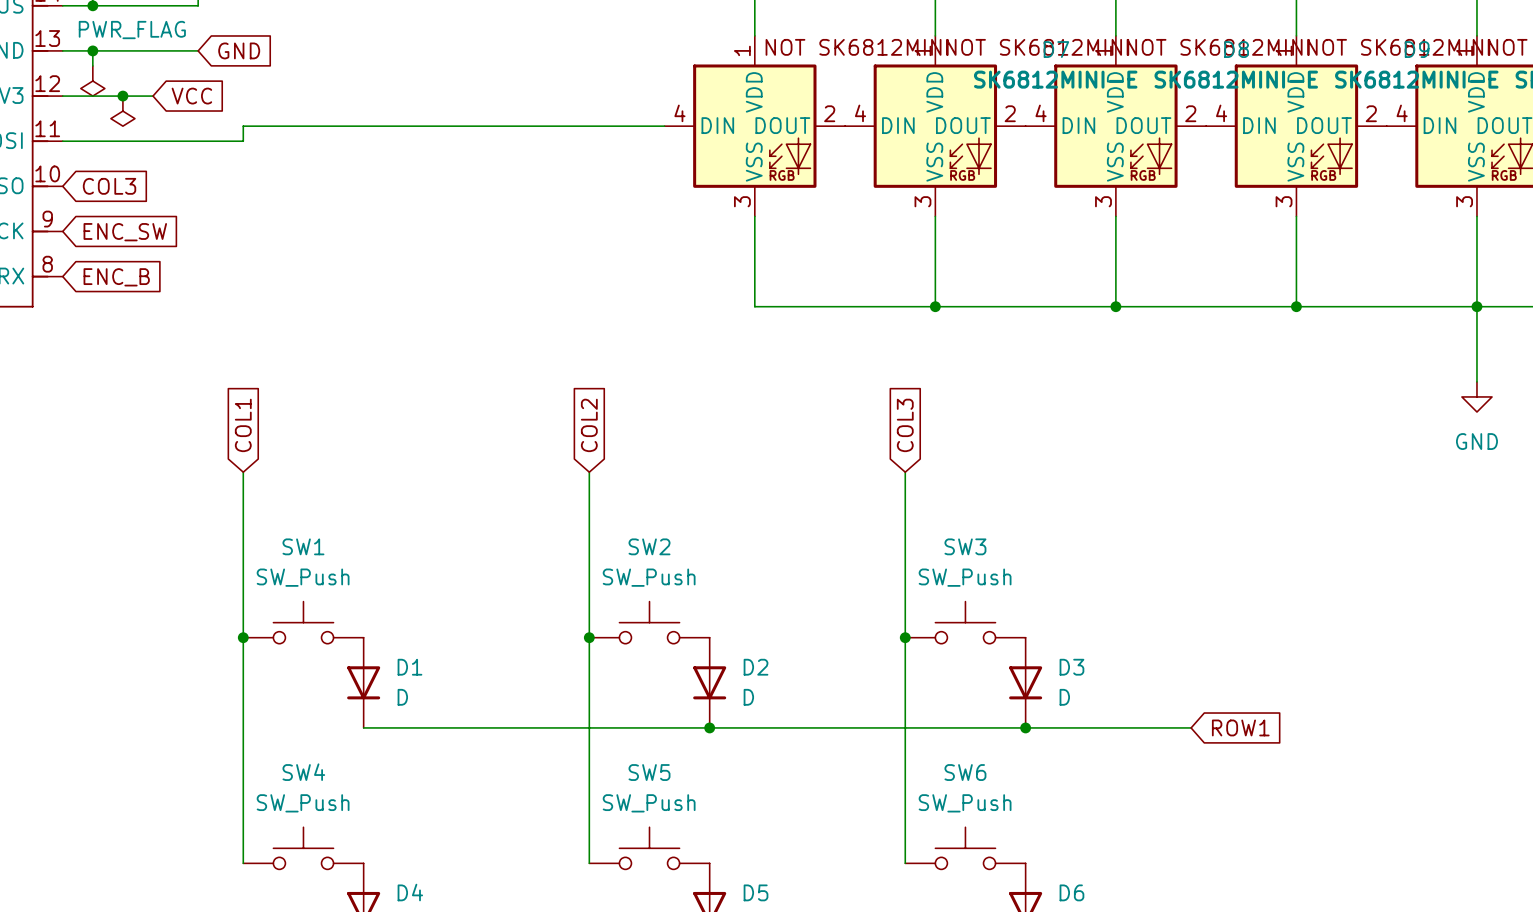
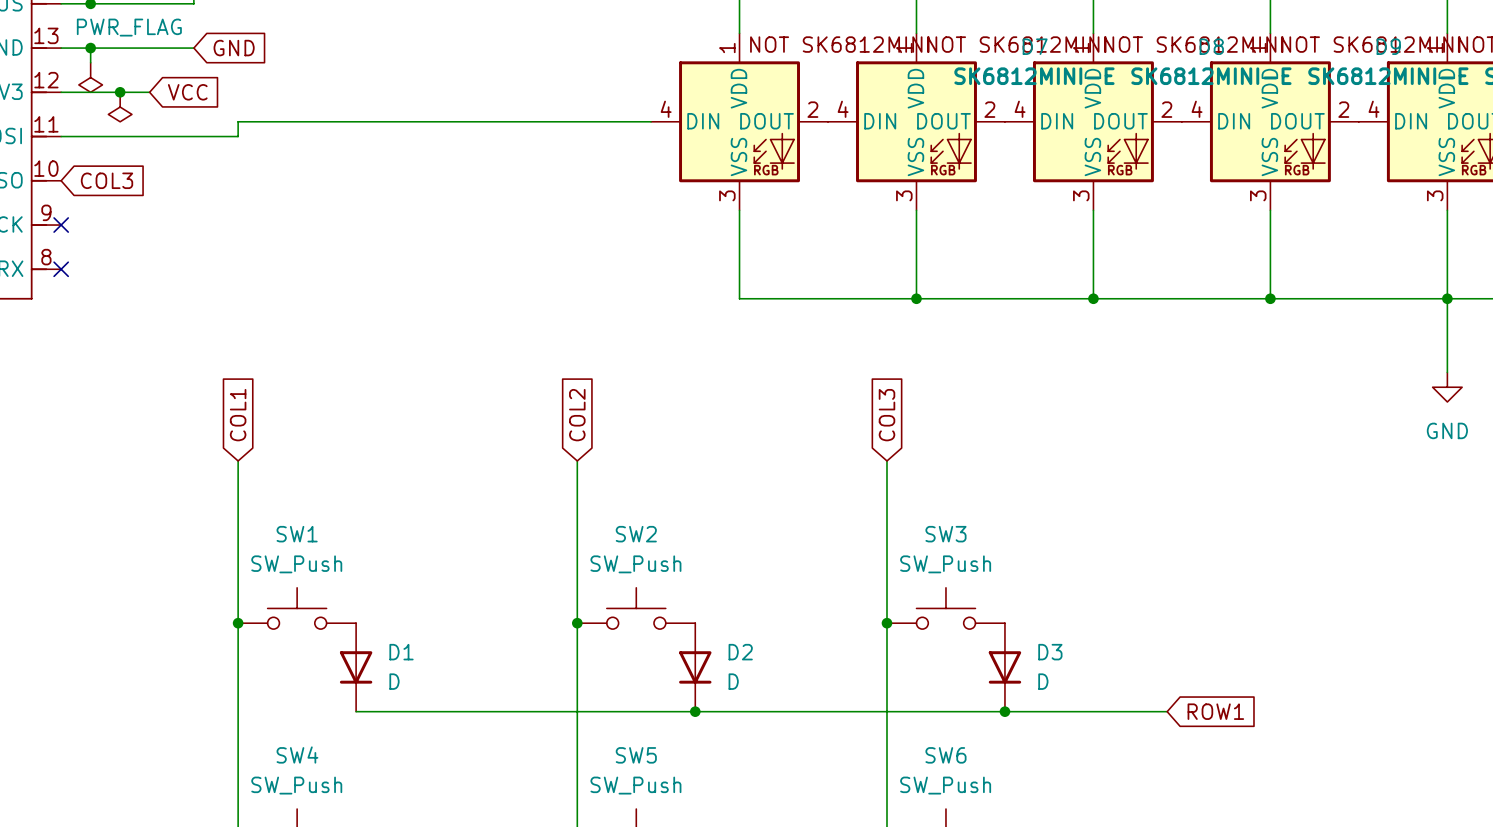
no-connect mark: none -> (61, 225)
global label: ENC_SW (125, 232) -> none
no-connect mark: none -> (61, 269)
global label: ENC_B (116, 277) -> none

